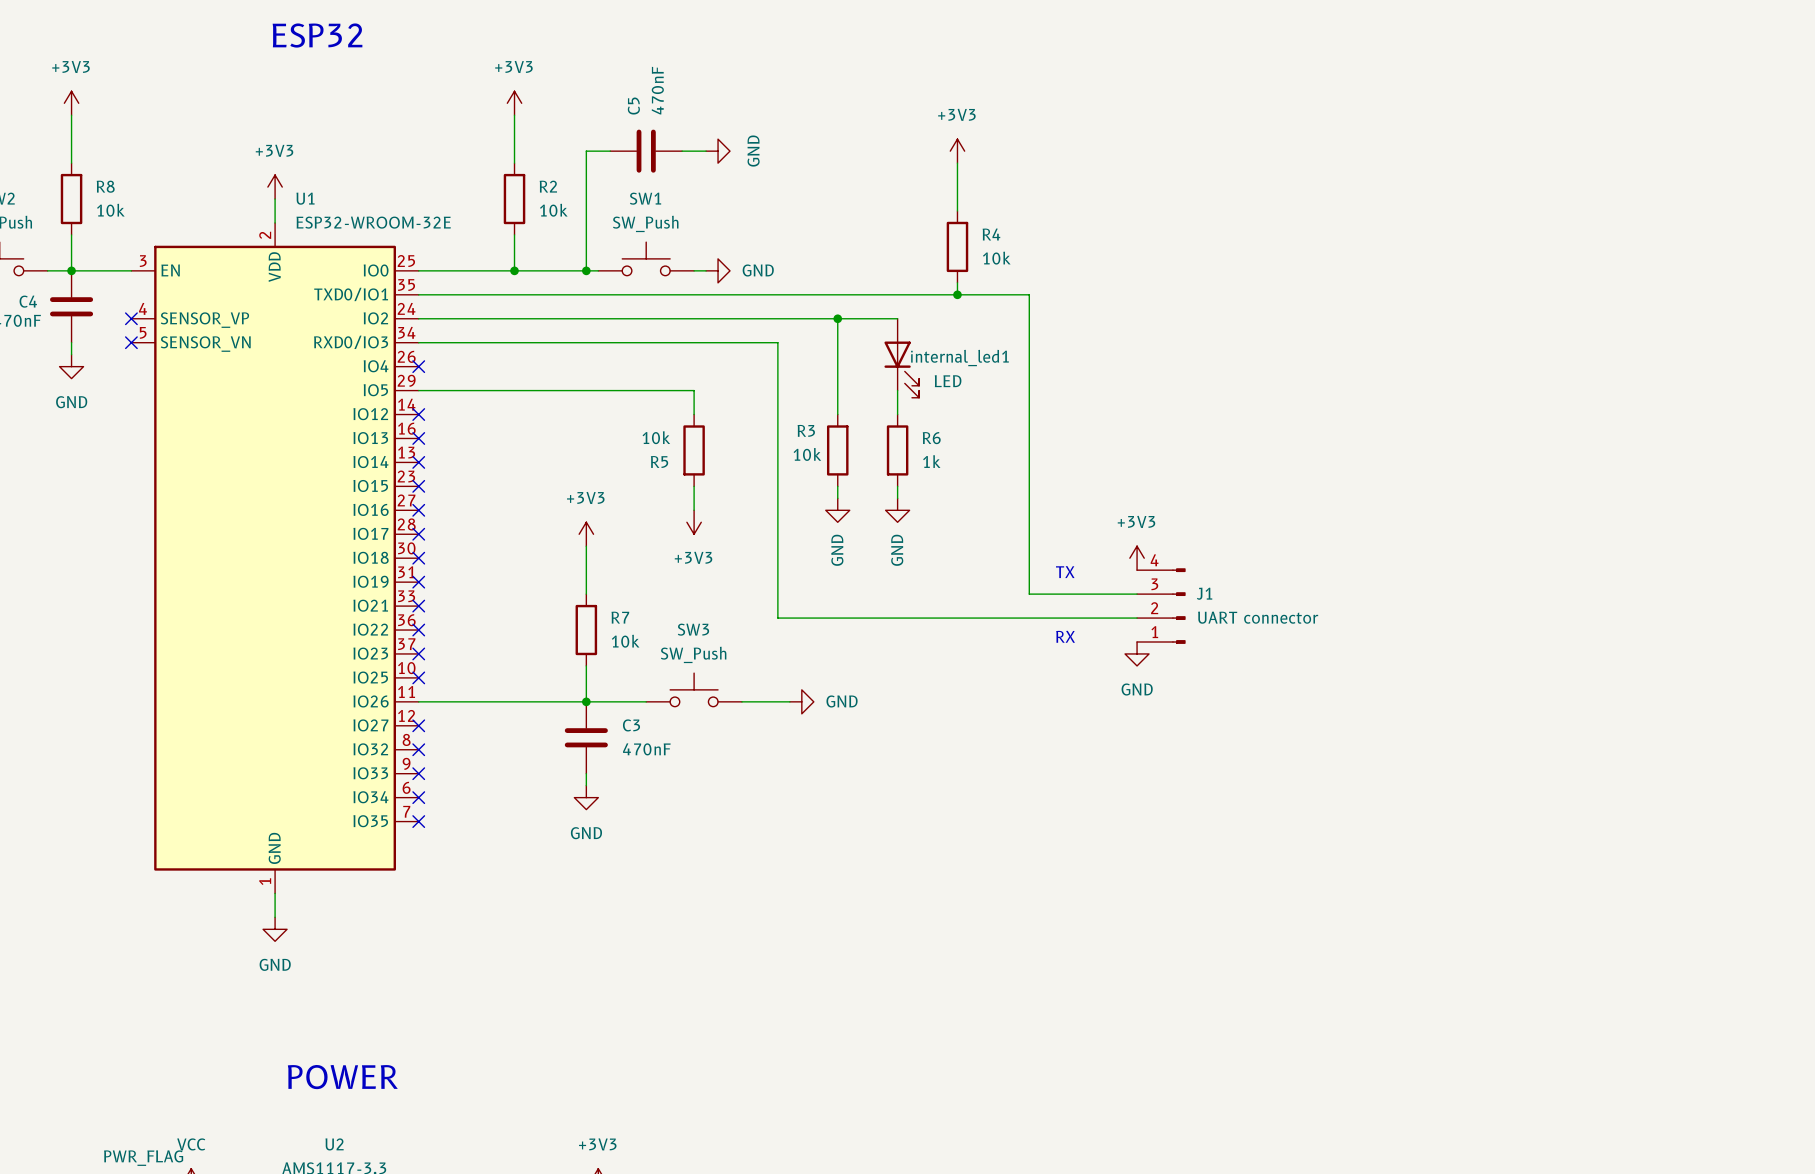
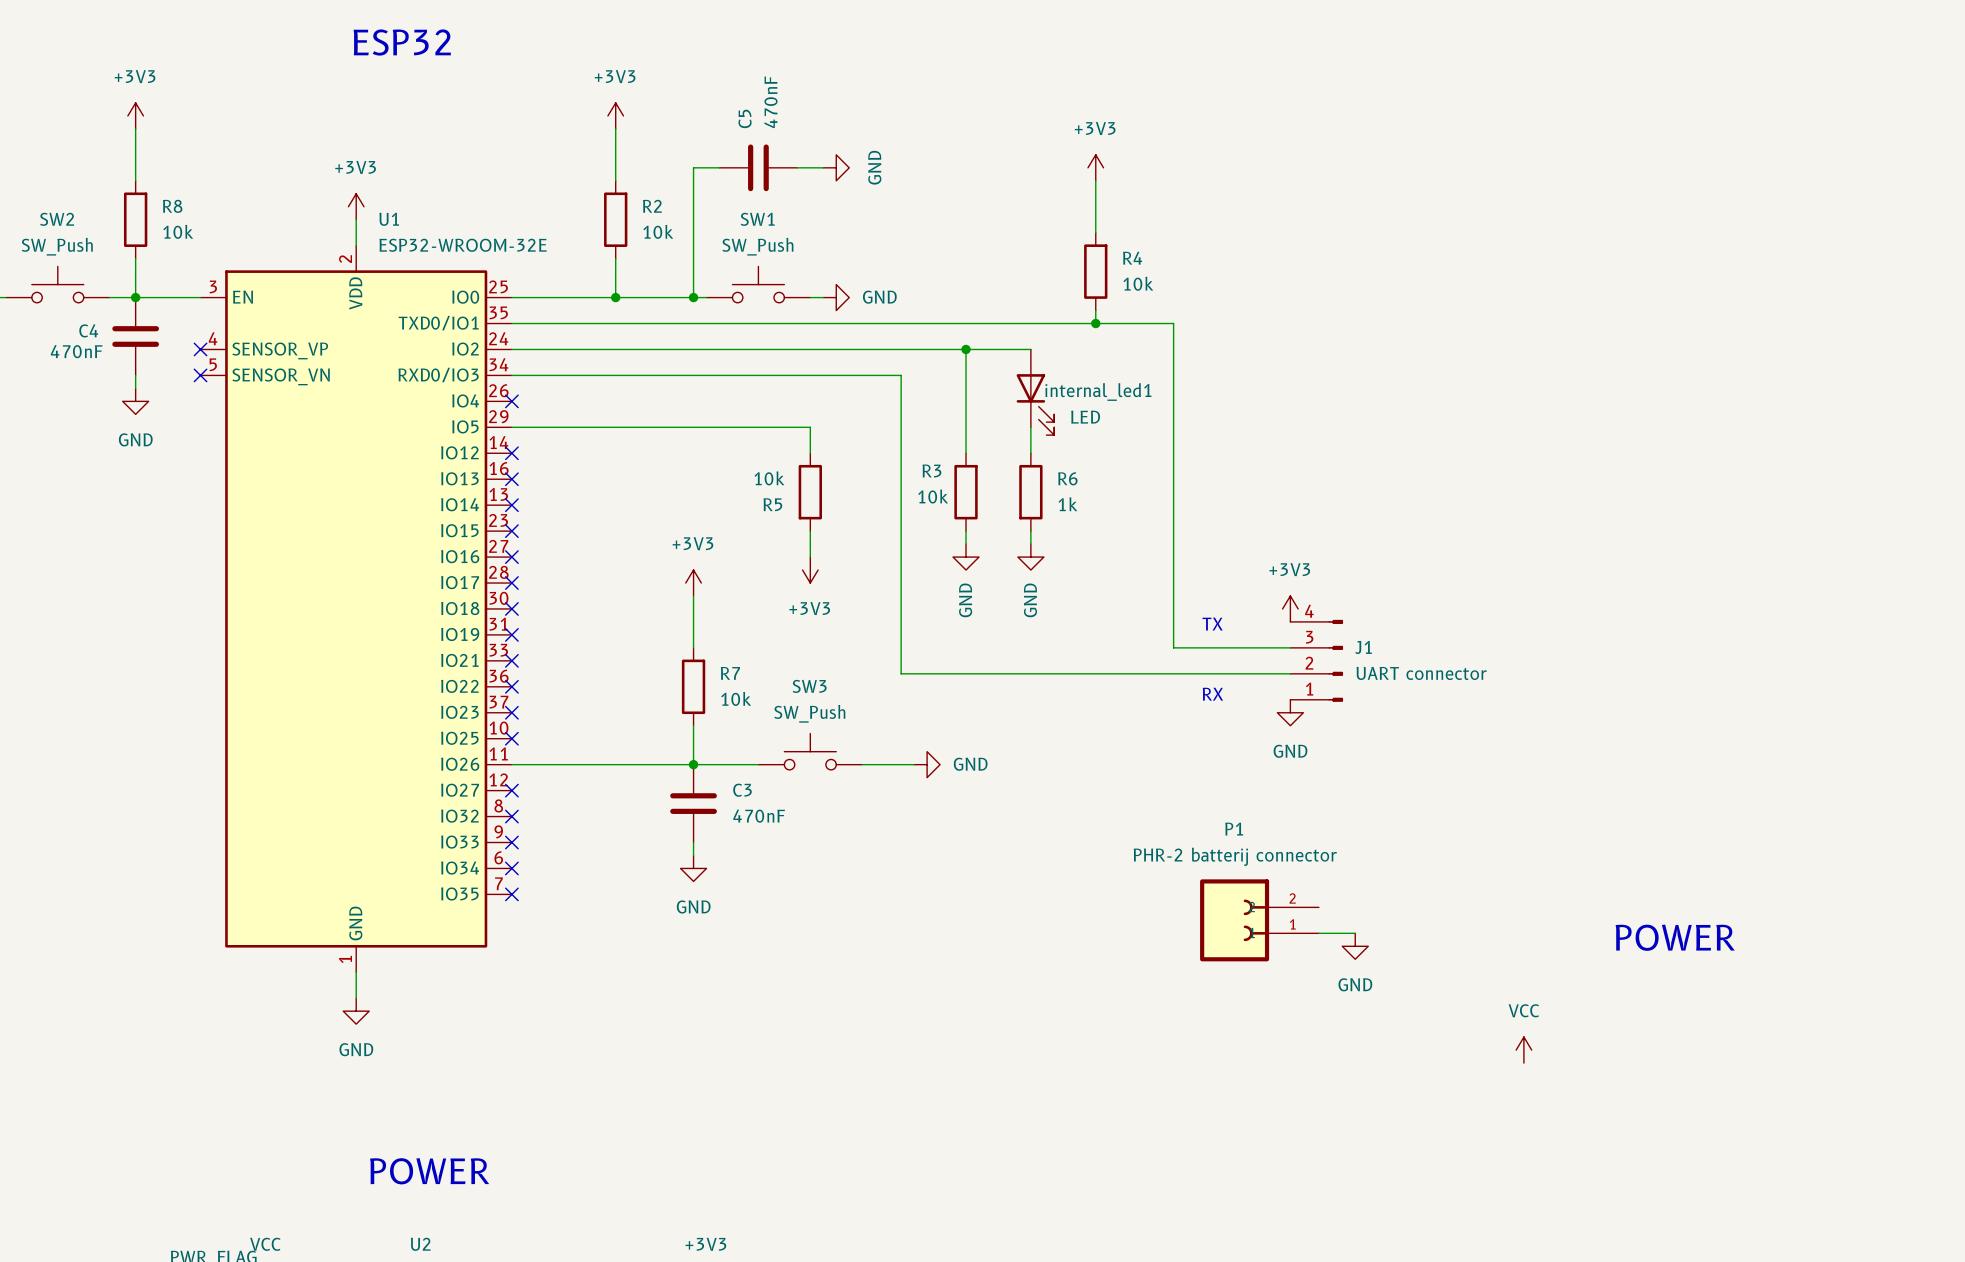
P1: none -> PHR-2 batterij connector (1259, 920)
wire: none -> (1318, 933) (1355, 933)
text: none -> POWER (1675, 937)
power symbol: none -> GND (1355, 946)
power symbol: none -> VCC (1523, 1050)

